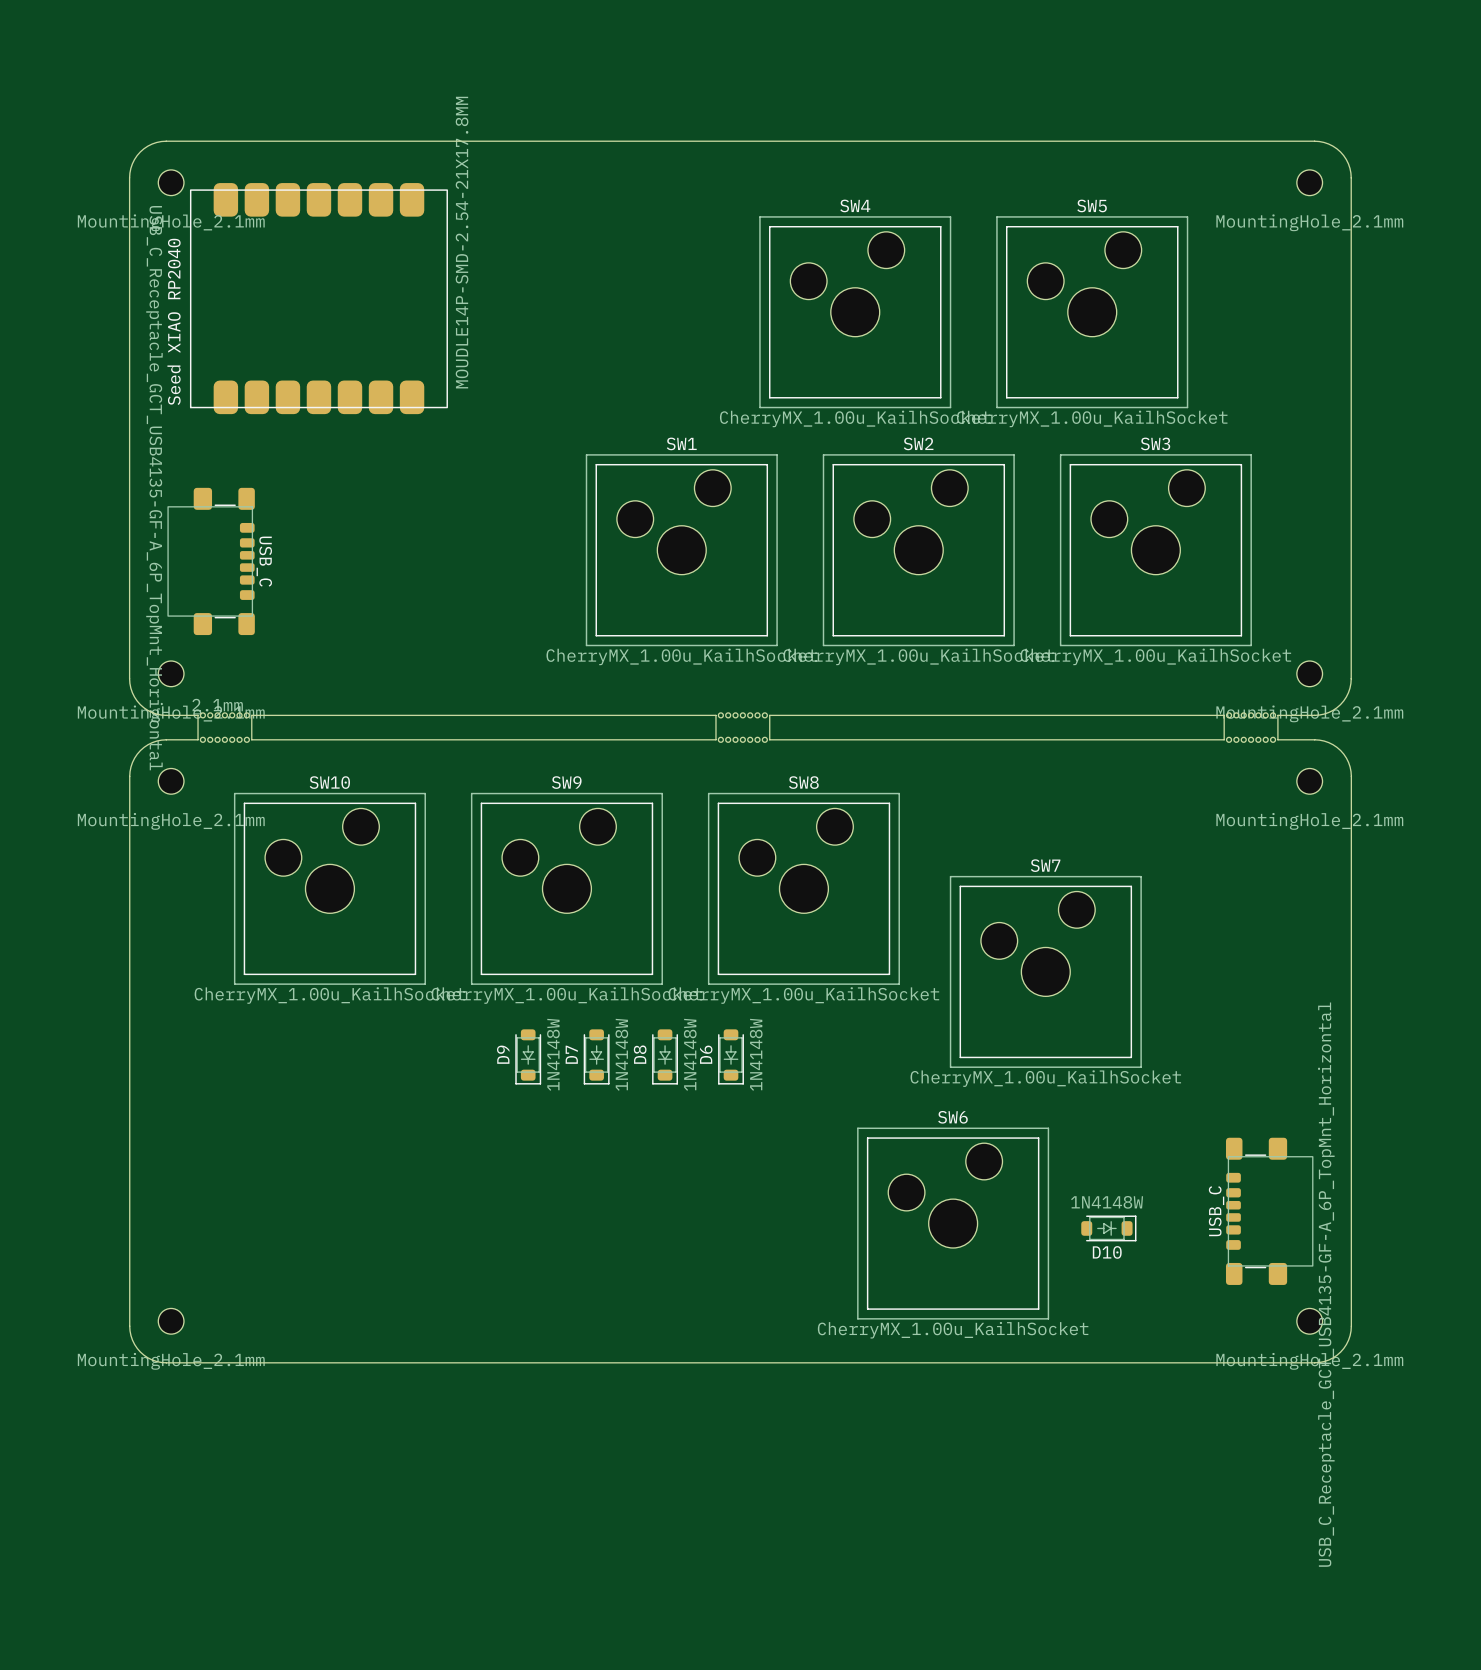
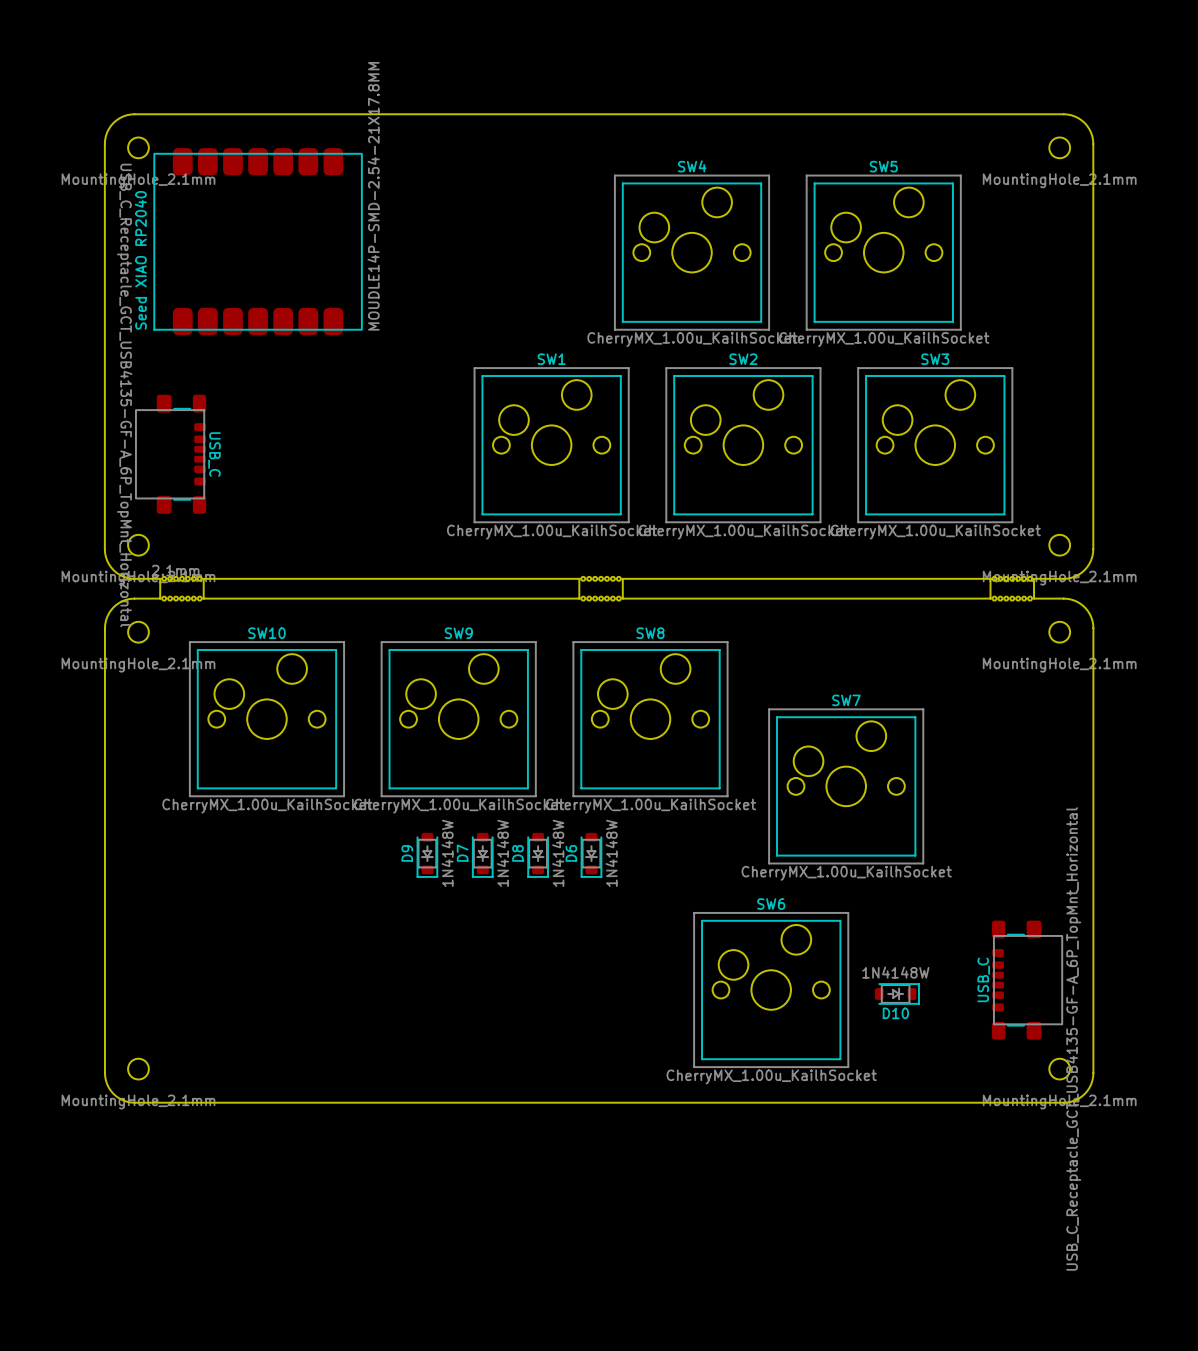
SW4 footprint: [759, 216, 952, 409] -> [614, 174, 770, 331]
SW5 footprint: [996, 216, 1189, 409] -> [806, 174, 962, 331]
SW1 footprint: [585, 454, 778, 647] -> [473, 367, 630, 523]
SW2 footprint: [822, 454, 1015, 647] -> [665, 367, 822, 523]
SW3 footprint: [1059, 454, 1252, 647] -> [857, 367, 1013, 523]
SW10 footprint: [233, 792, 426, 985] -> [189, 641, 345, 797]
SW9 footprint: [470, 792, 663, 985] -> [381, 641, 537, 797]
SW8 footprint: [707, 792, 900, 985] -> [572, 641, 729, 797]
SW7 footprint: [949, 875, 1142, 1068] -> [768, 708, 924, 865]
SW6 footprint: [857, 1127, 1050, 1320] -> [693, 912, 849, 1068]

